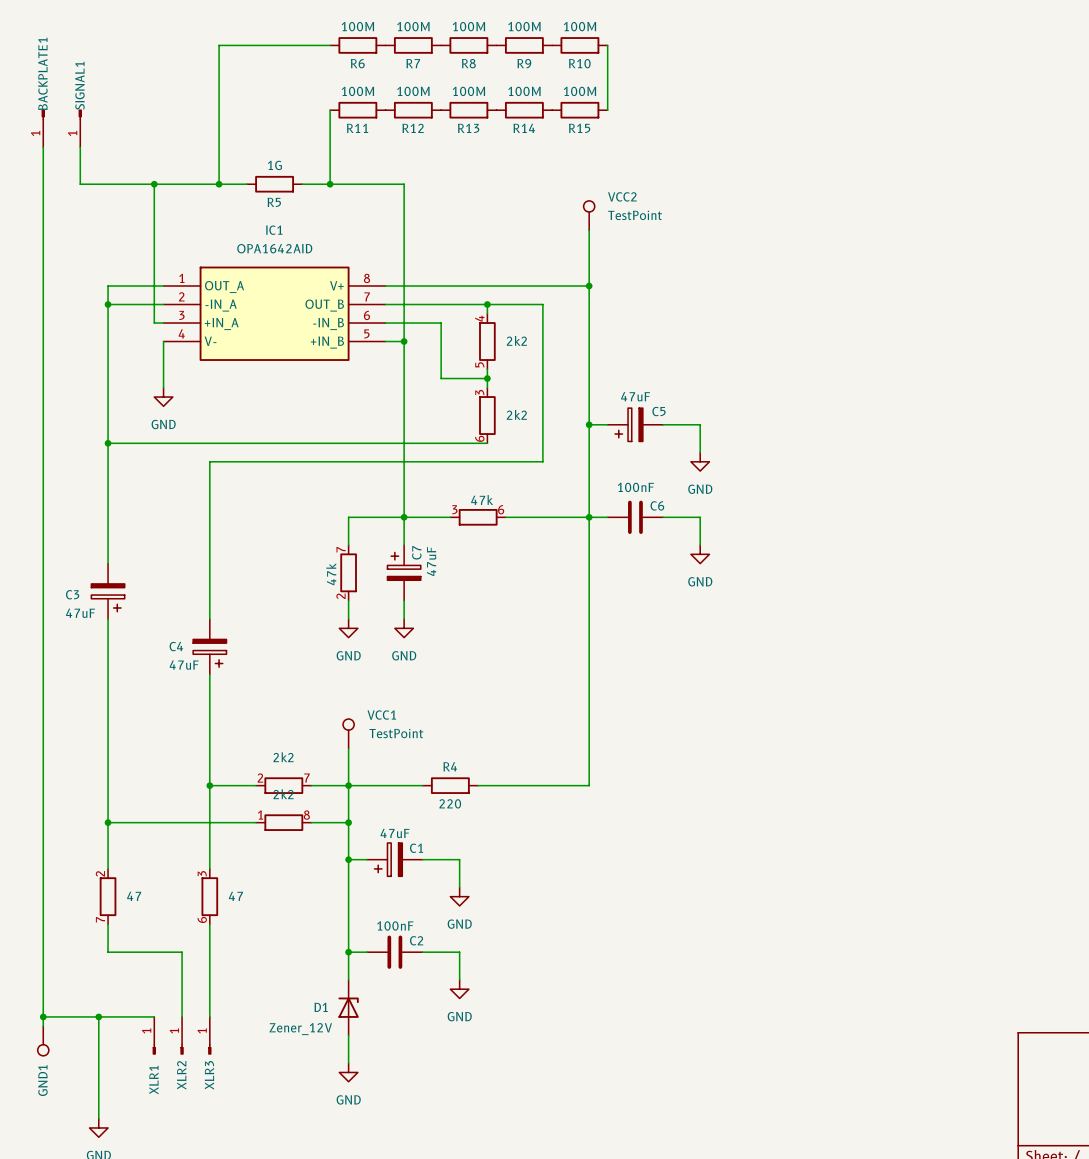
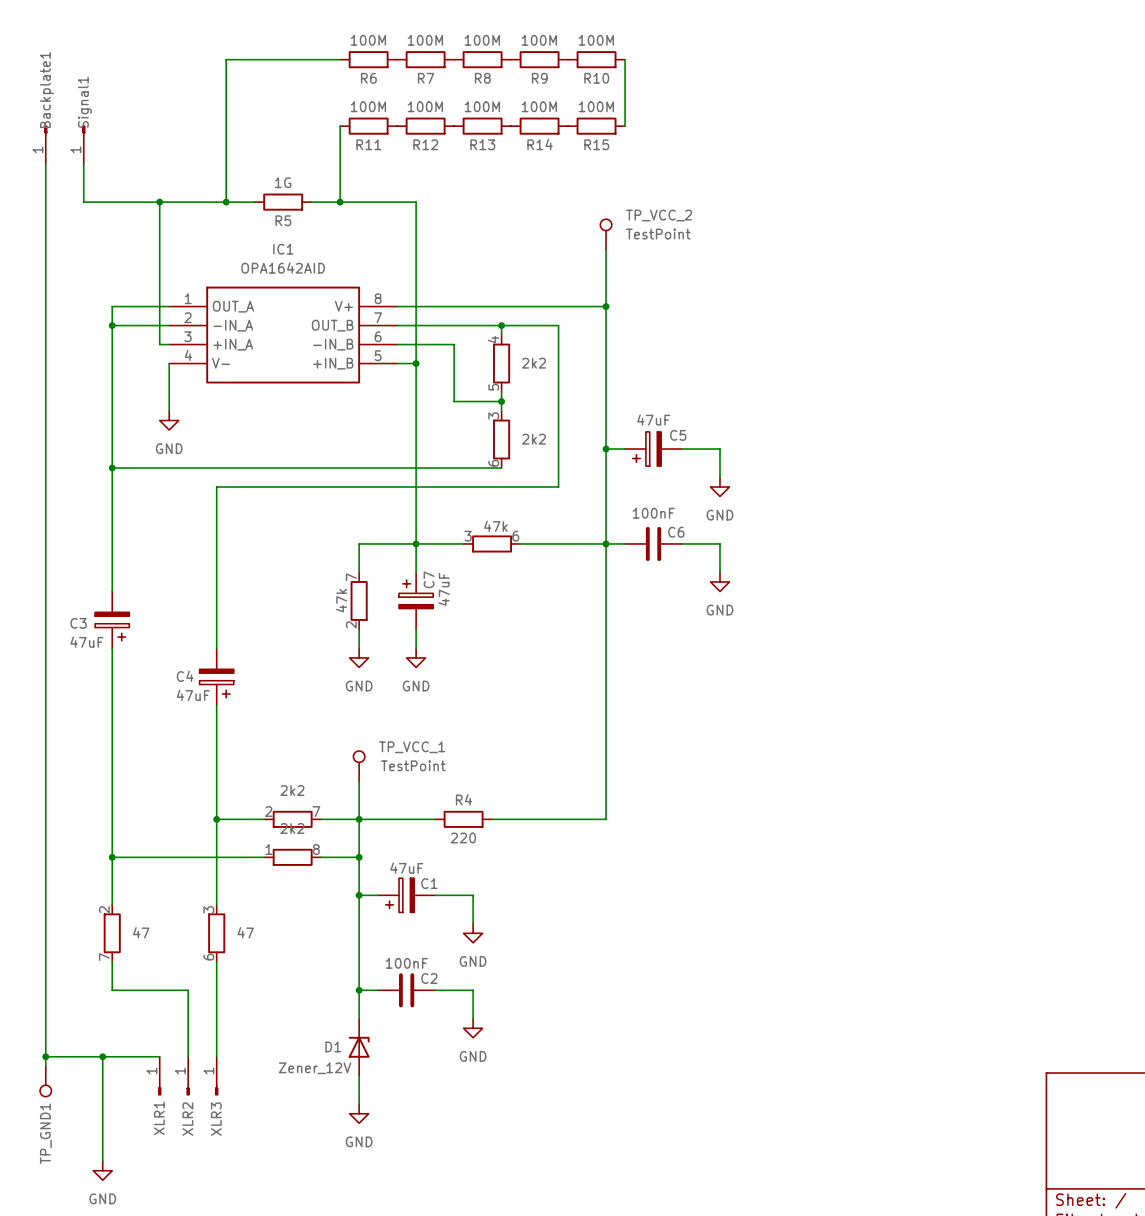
BACKPLATE1 name: BACKPLATE1 (42, 73) -> Backplate1 (46, 90)
SIGNAL1 name: SIGNAL1 (79, 85) -> Signal1 (84, 102)
VCC2 name: VCC2 (622, 196) -> TP_VCC_2 (659, 215)
VCC1 name: VCC1 (381, 715) -> TP_VCC_1 (412, 747)
GND1 name: GND1 (42, 1080) -> TP_GND1 (45, 1133)

